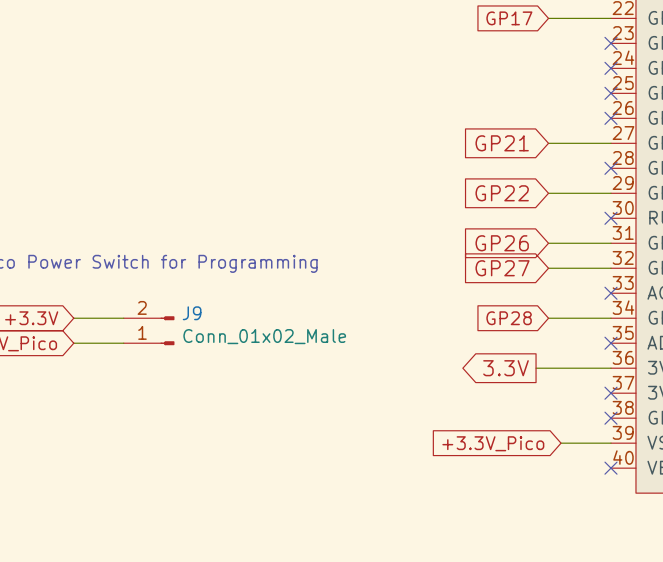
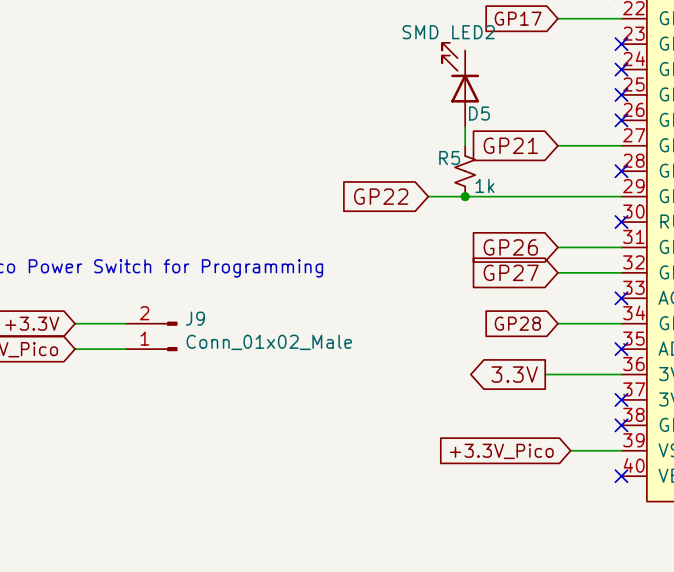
D5: none -> SMD LED2 (460, 84)
wire: none -> (465, 126) (465, 145)
R5: none -> 1k (465, 171)
wire: none -> (428, 196) (557, 196)
junction: none -> (465, 196)
global label position: GP22 (502, 193) -> GP22 (381, 196)

